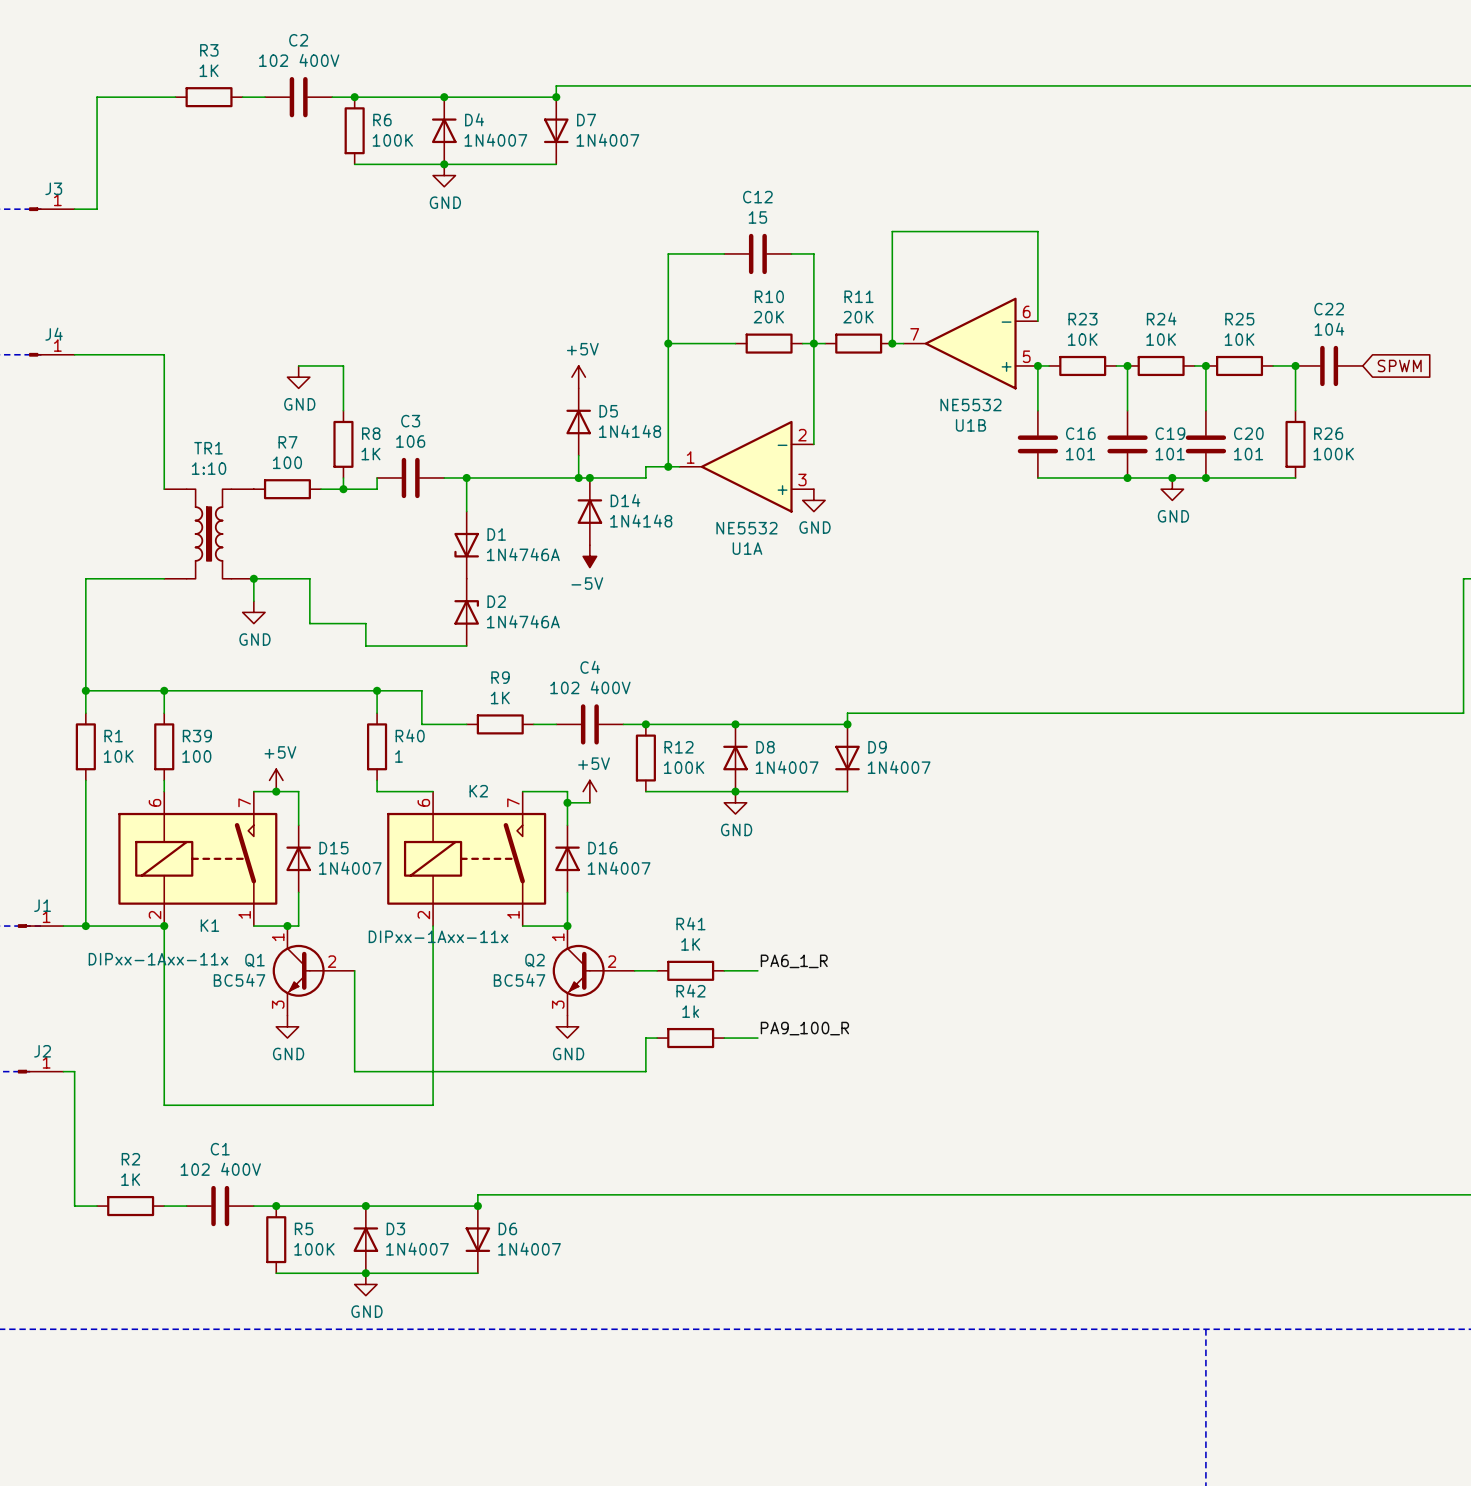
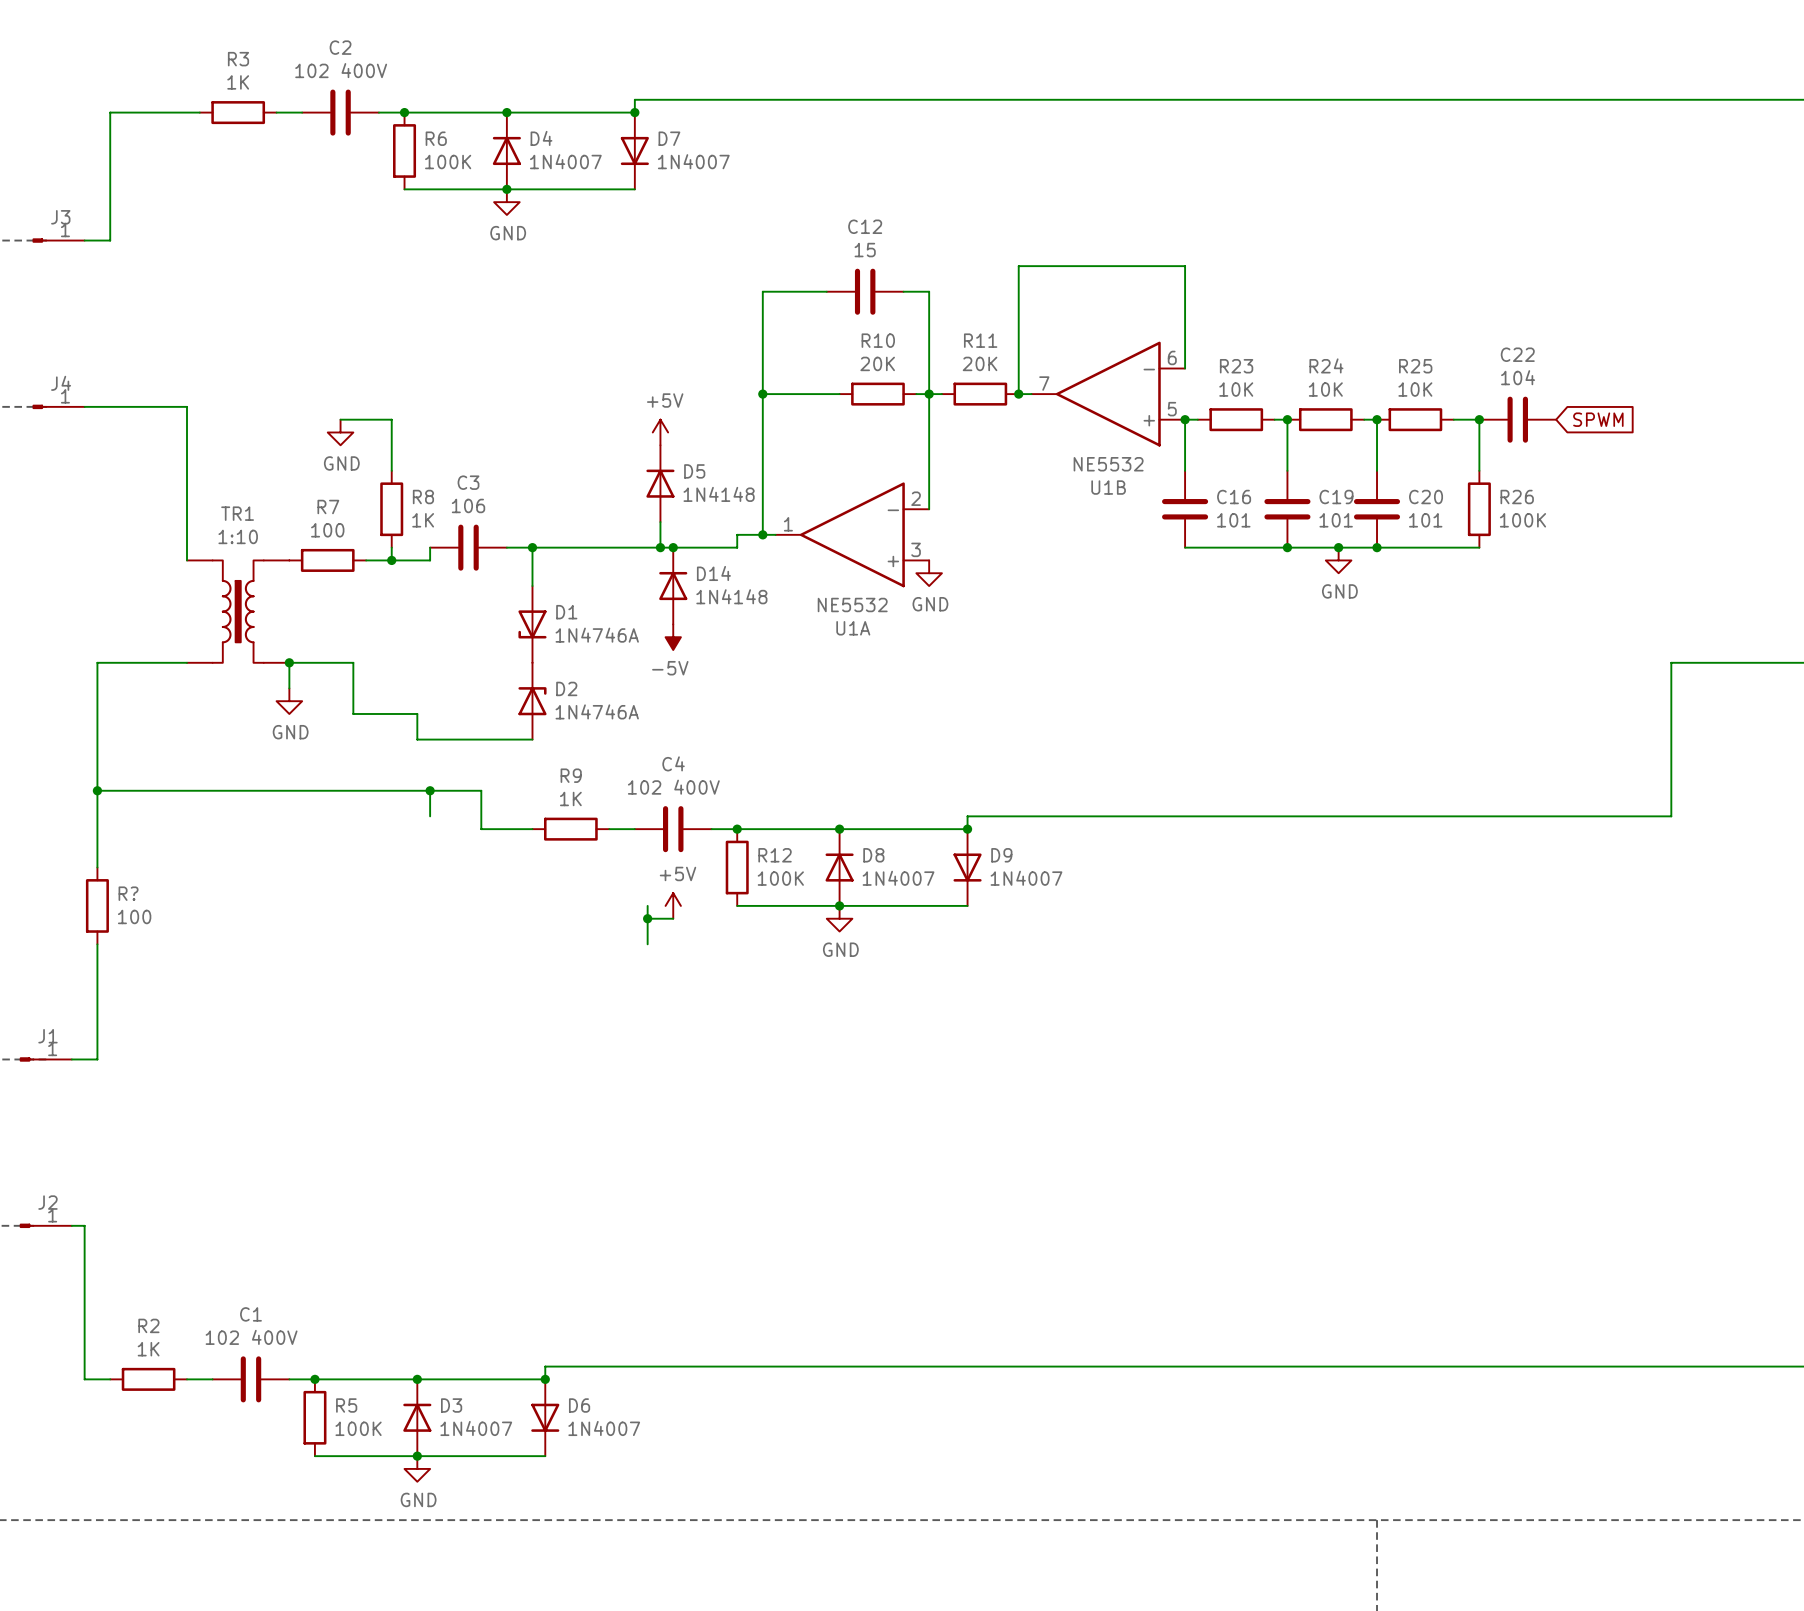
wire: (164, 690) (164, 713) -> none
junction: (164, 690) -> none
R1: 10K (85, 746) -> none
R39: 100 (164, 746) -> none
R40: 1 (377, 746) -> none
wire: (85, 780) (85, 825) -> (97, 816) (97, 867)
wire: (164, 780) (164, 791) -> none
power symbol: +5V (276, 780) -> none
wire: (377, 780) (377, 791) (433, 791) -> none
R?: none -> 100 (97, 905)
wire: (253, 791) (298, 791) (298, 825) -> none
junction: (276, 791) -> none
wire: (522, 791) (567, 791) -> none
K1: DIPxx-1Axx-11x (197, 858) -> none
D15: 1N4007 (298, 858) -> none
K2: DIPxx-1Axx-11x (466, 858) -> none
D16: 1N4007 (567, 858) -> none
wire: (298, 892) (298, 926) (253, 926) -> none
wire: (567, 892) (567, 926) (522, 926) -> none
wire: (85, 926) (164, 926) (164, 1105) (433, 1105) (433, 926) -> none
junction: (85, 926) -> none
junction: (164, 926) -> none
junction: (287, 926) -> none
junction: (567, 926) -> none
label: PA6_1_R (794, 961) -> none
Q1: BC547 (313, 970) -> none
wire: (354, 970) (354, 1071) (645, 1071) (645, 1038) (657, 1038) -> none
Q2: BC547 (593, 970) -> none
wire: (634, 970) (657, 970) -> none
R41: 1K (690, 970) -> none
wire: (724, 970) (757, 970) -> none
power symbol: GND (287, 1026) -> none
power symbol: GND (567, 1026) -> none
label: PA9_100_R (804, 1028) -> none
R42: 1k (690, 1038) -> none
wire: (724, 1038) (757, 1038) -> none

